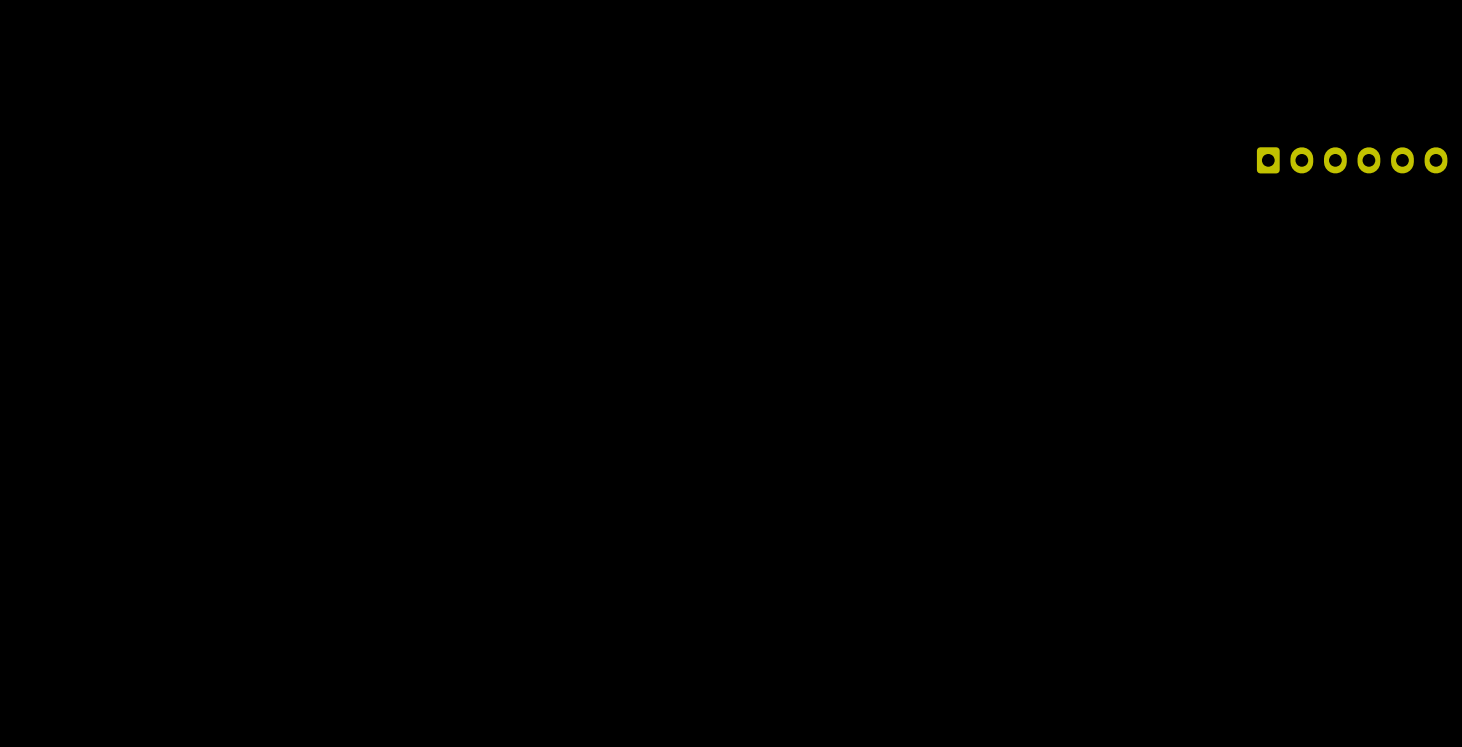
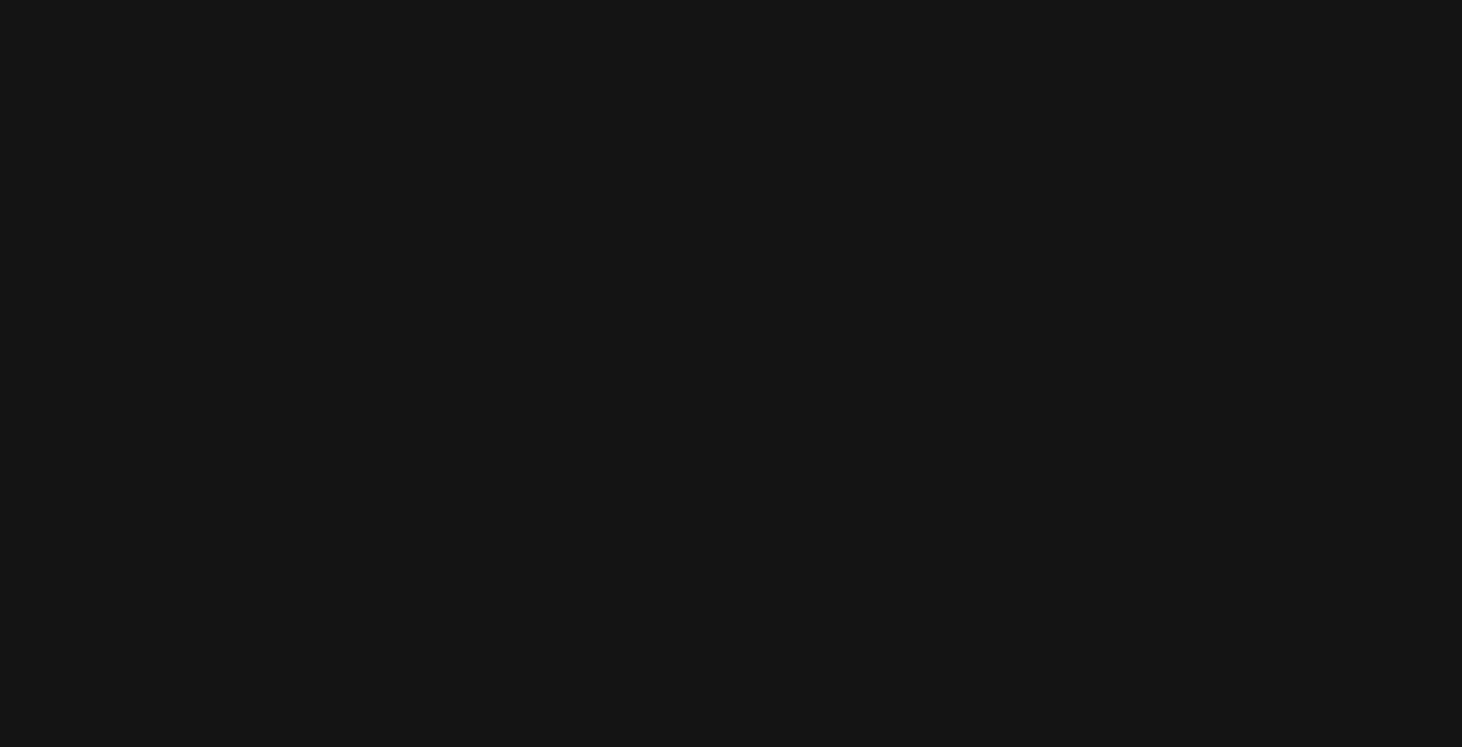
part: (1352, 160) -> none

